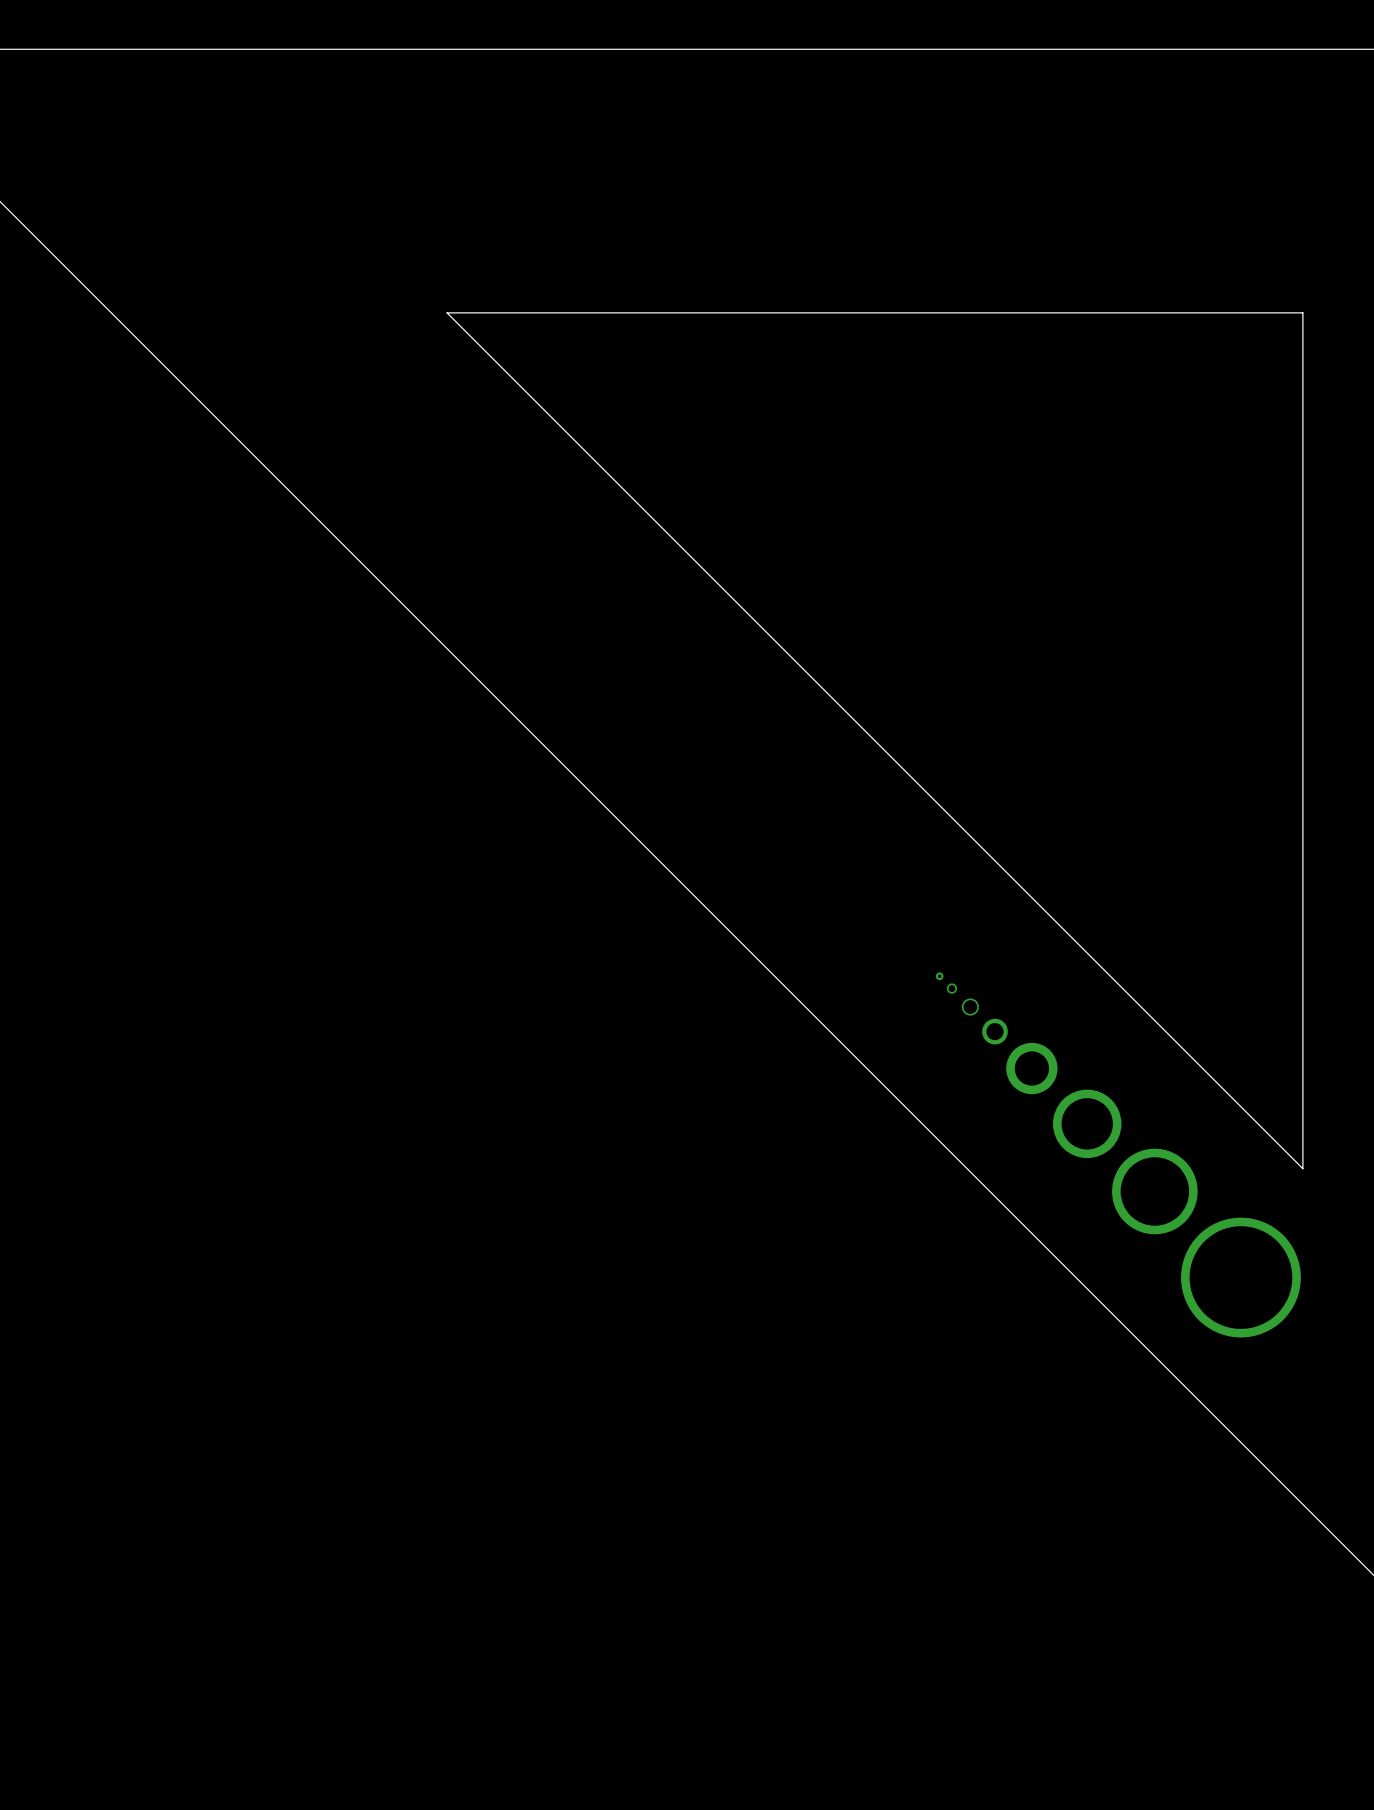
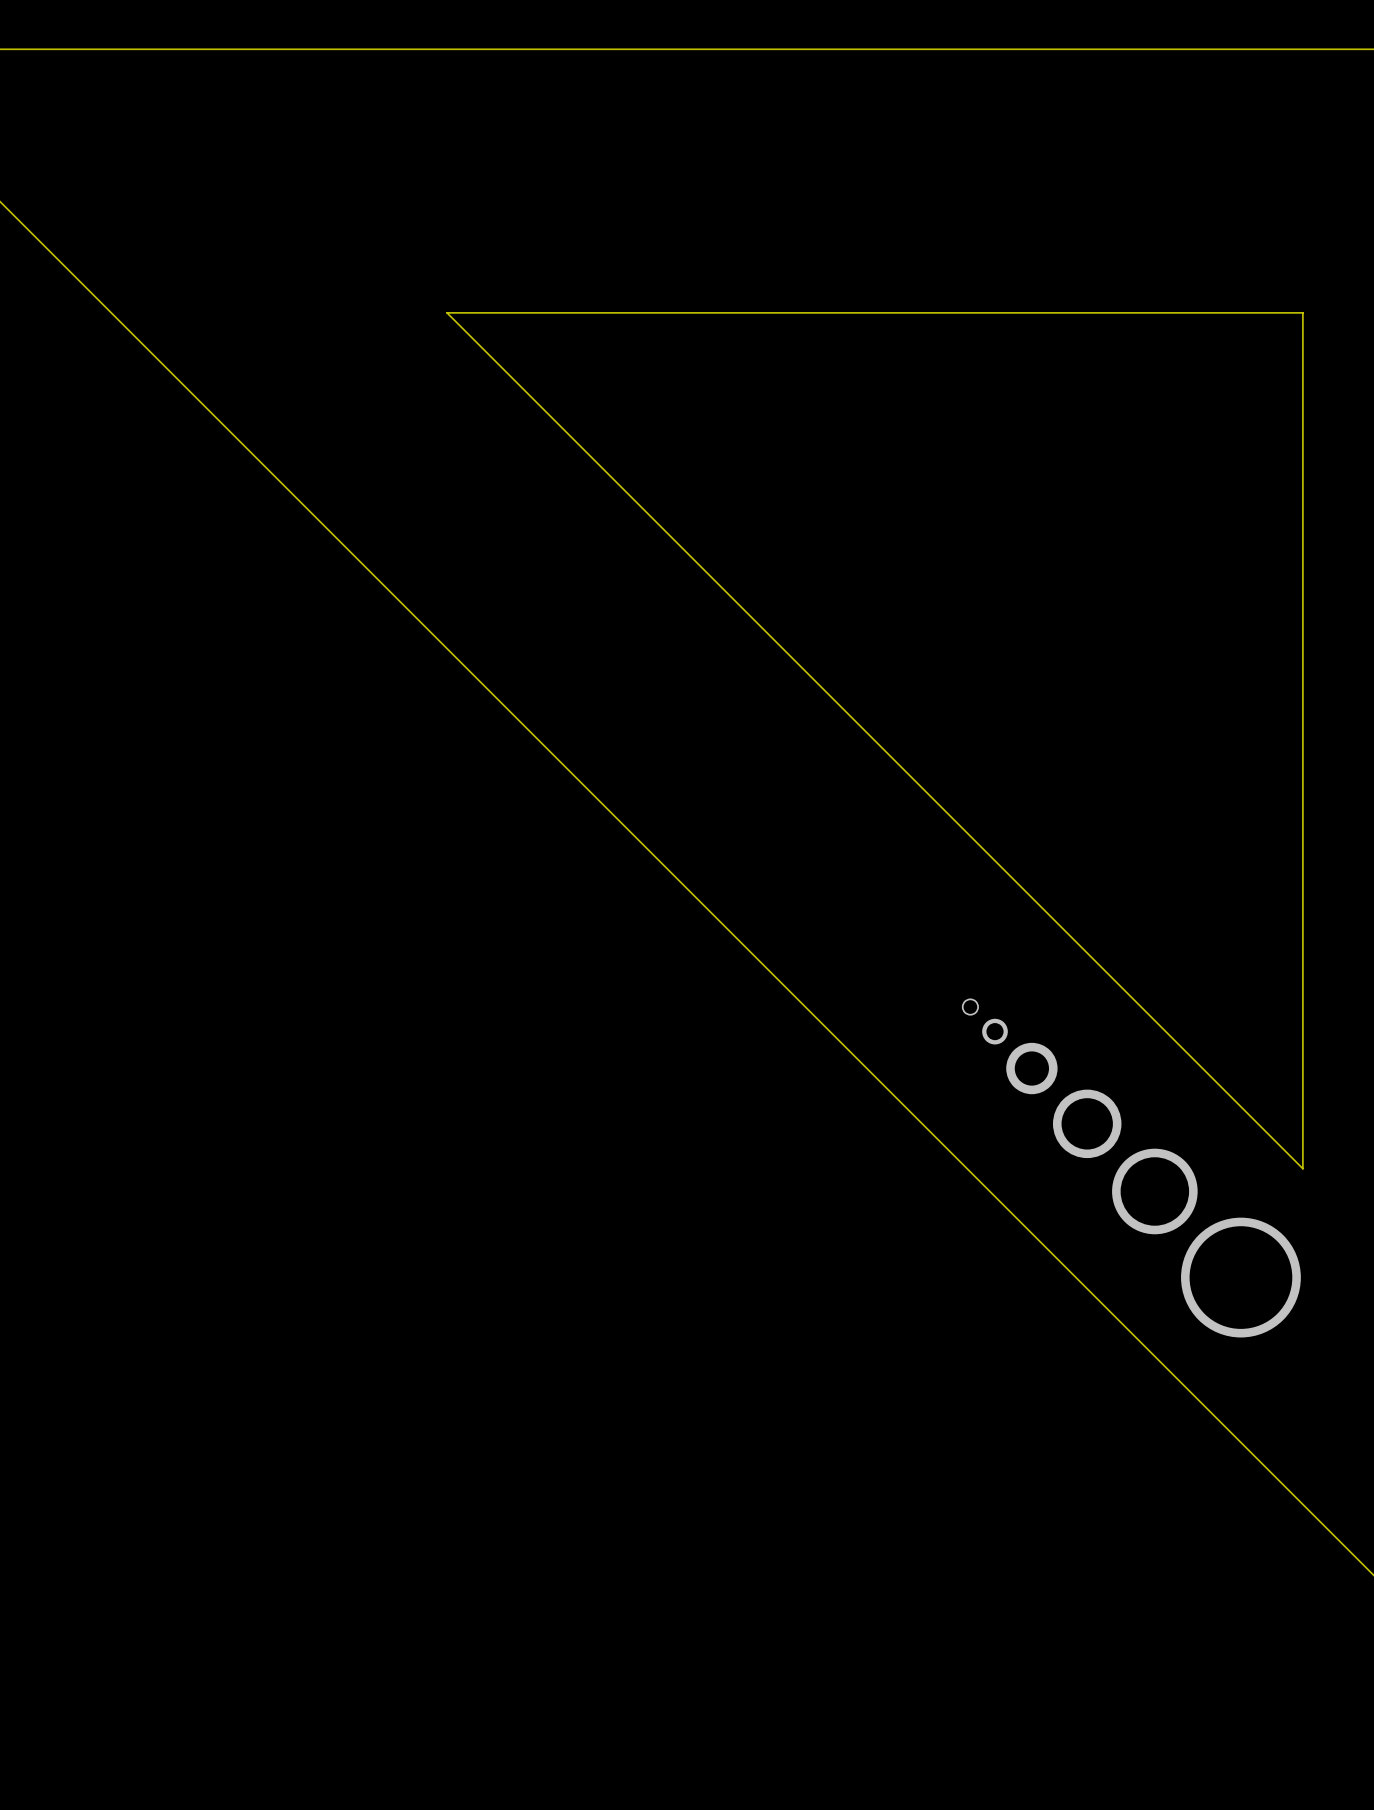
via: (939, 976) -> none
via: (951, 988) -> none

